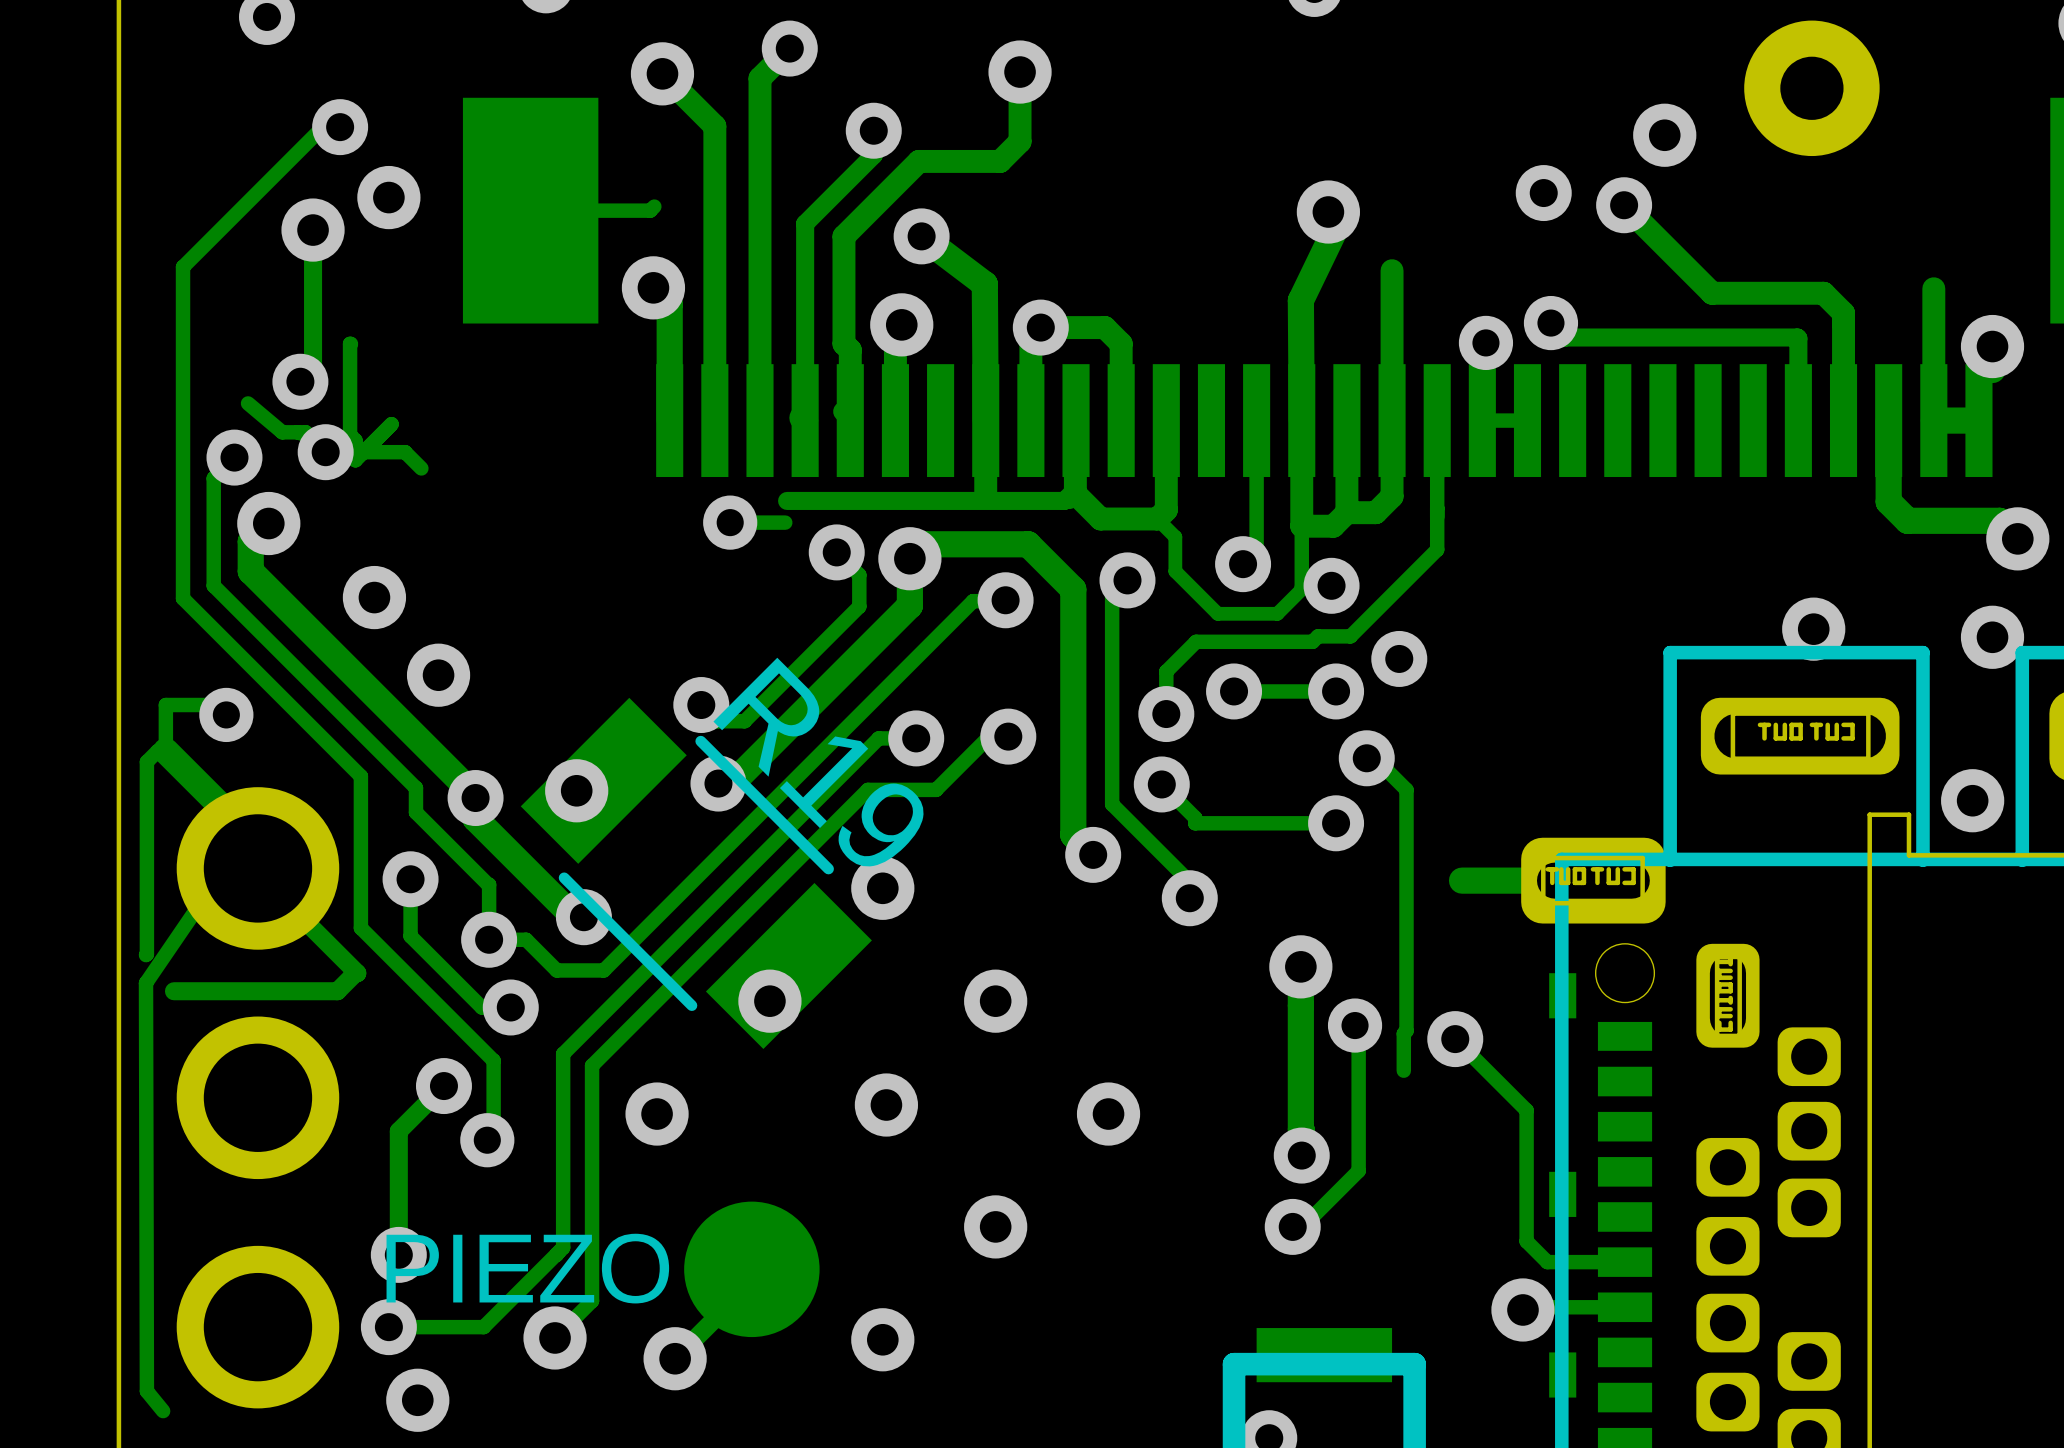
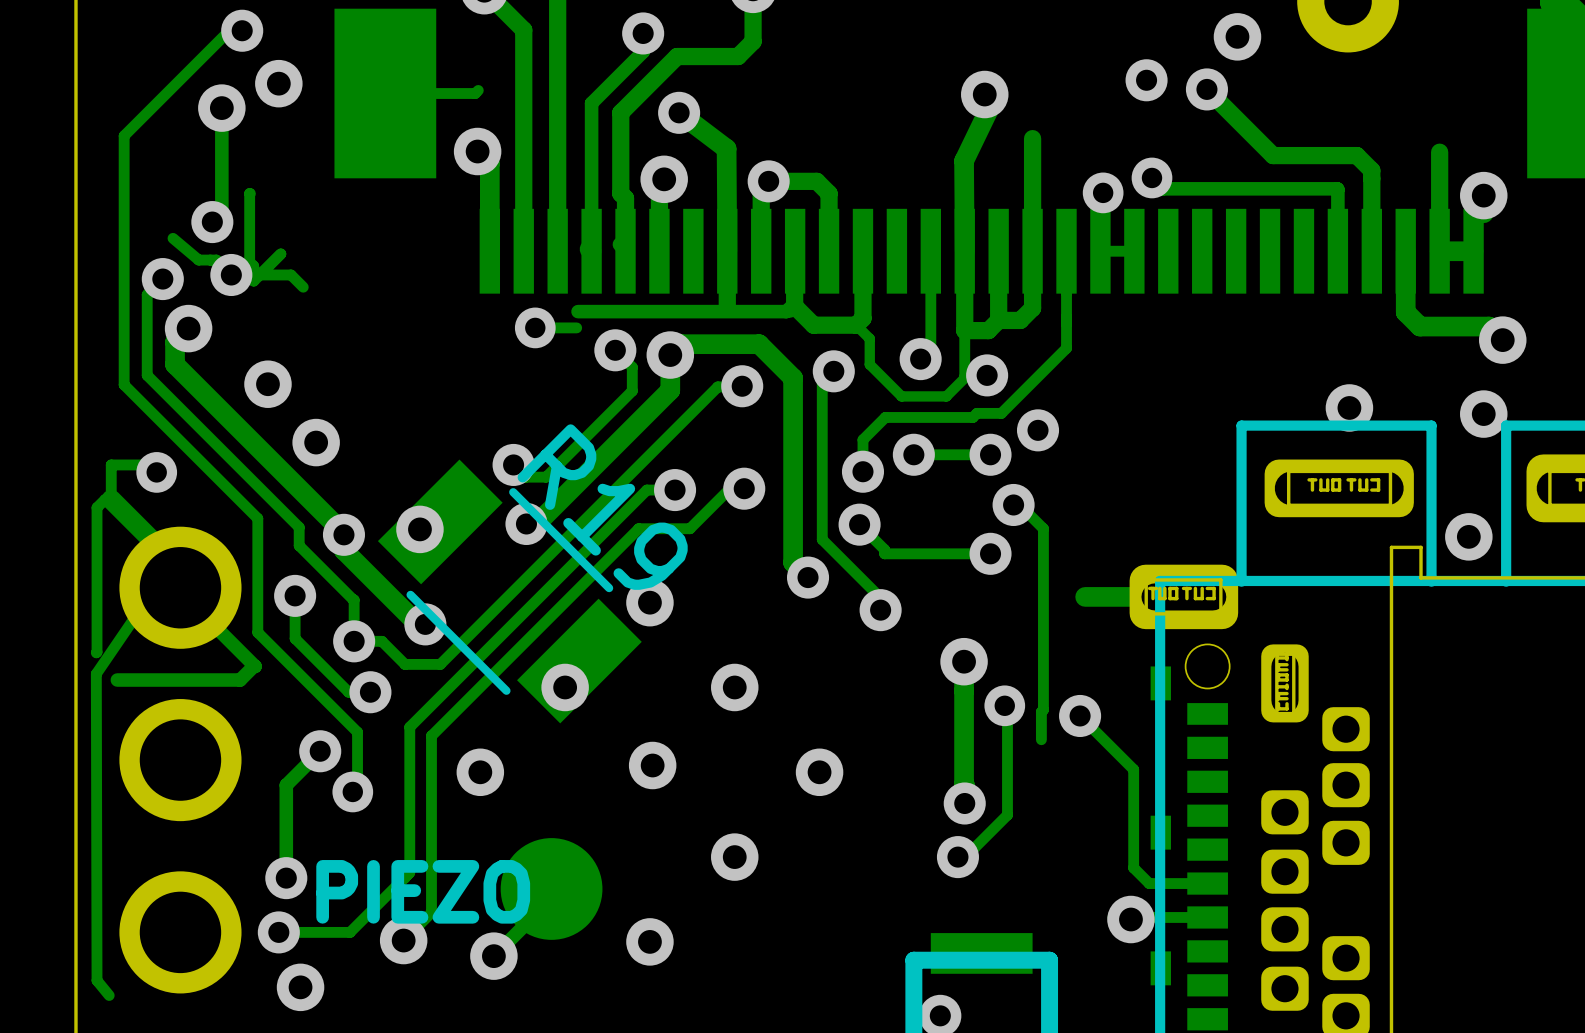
text position: PIEZO (527, 1268) -> PIEZO (423, 891)

